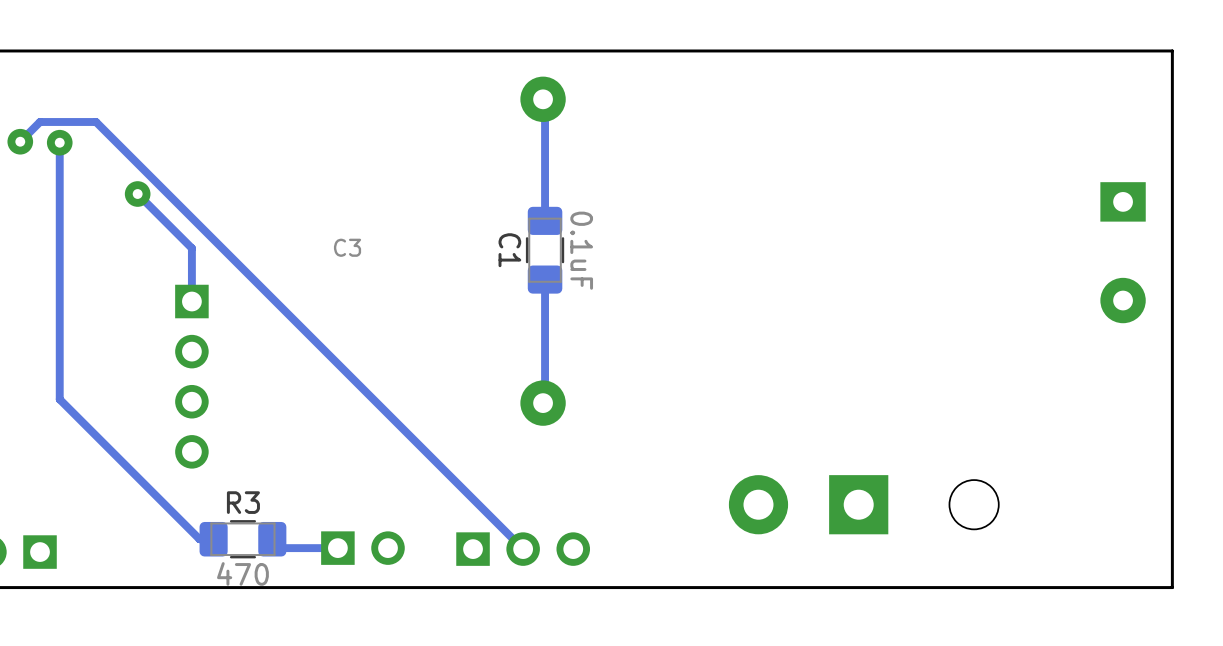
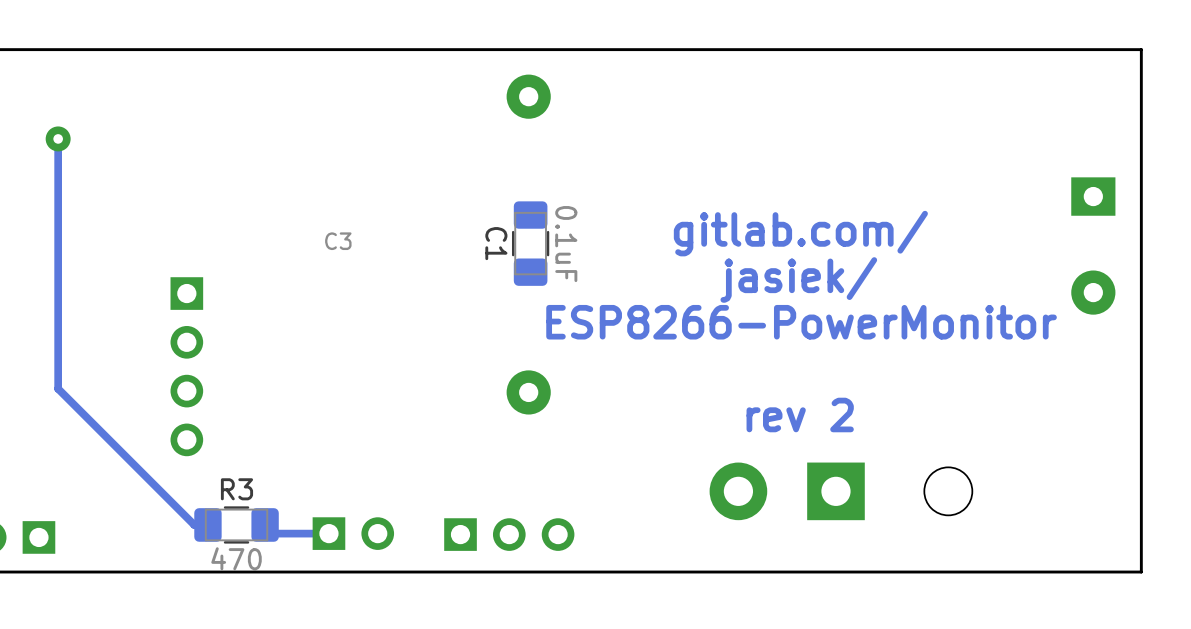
track: (543, 99) (545, 101) (545, 220) -> none
track: (20, 141) (40, 121) (96, 121) (523, 549) -> none
via: (20, 141) -> none
track: (137, 194) (191, 248) (191, 301) -> none
via: (137, 194) -> none
text: none -> gitlab.com/ (800, 233)
track: (545, 279) (545, 401) (543, 403) -> none
text: none -> jasiek/ (798, 279)
text: none -> ESP8266-PowerMonitor (801, 322)
text: none -> rev 2 (800, 414)

